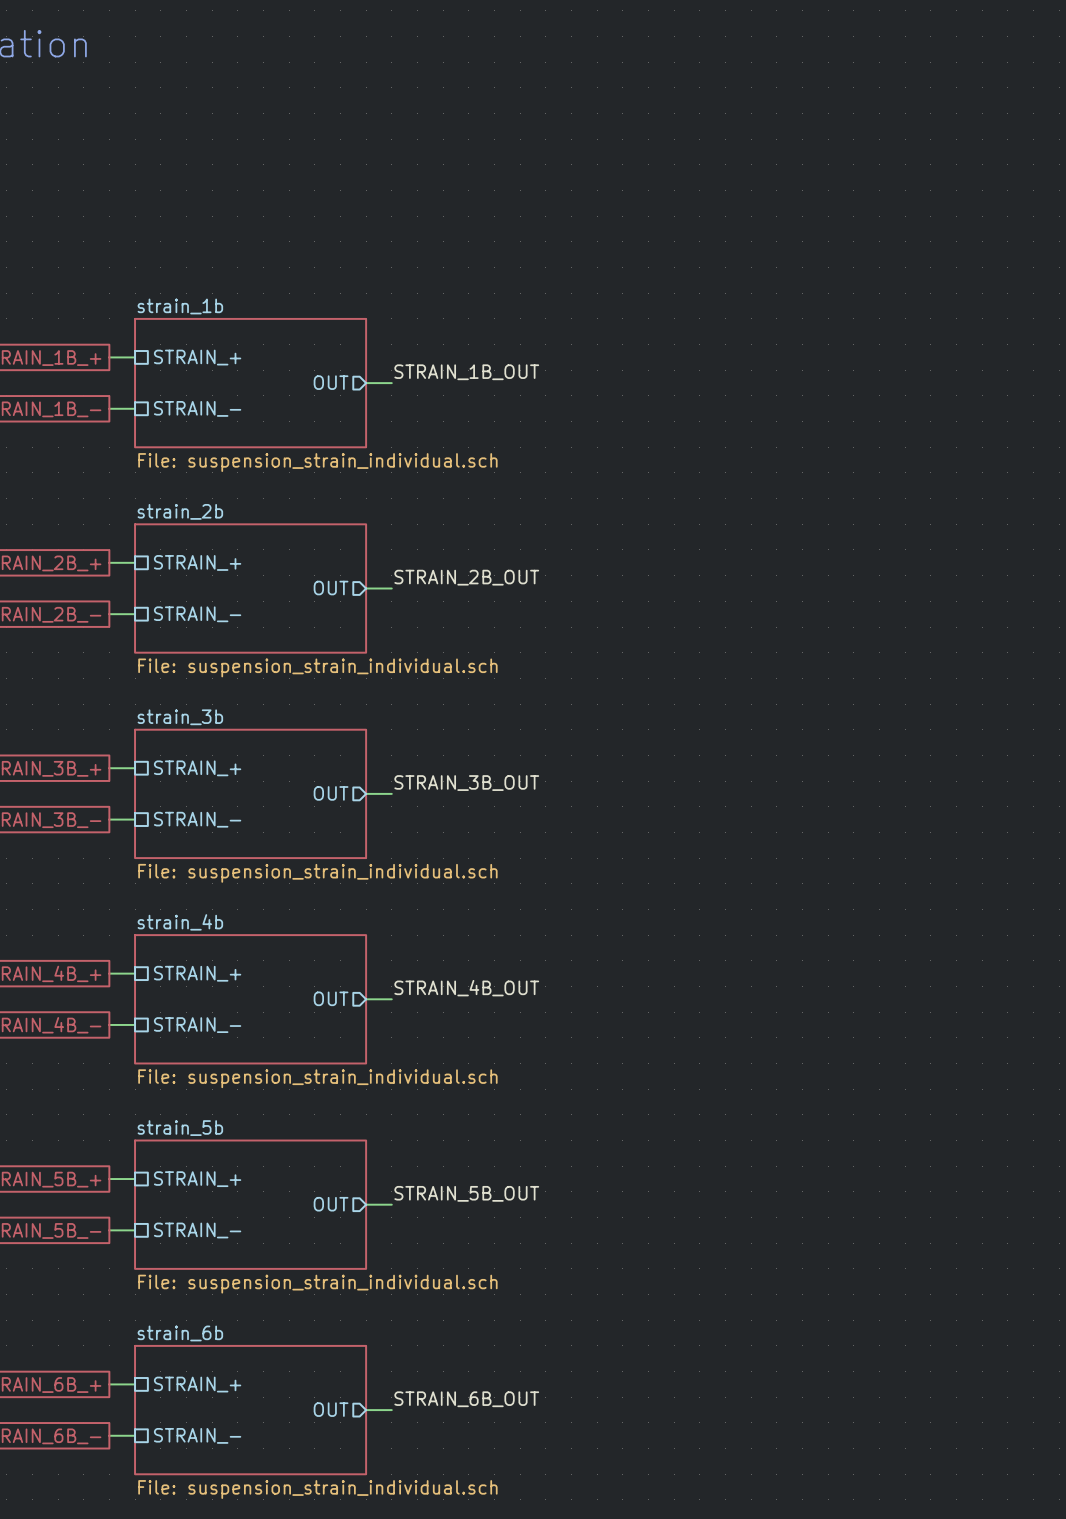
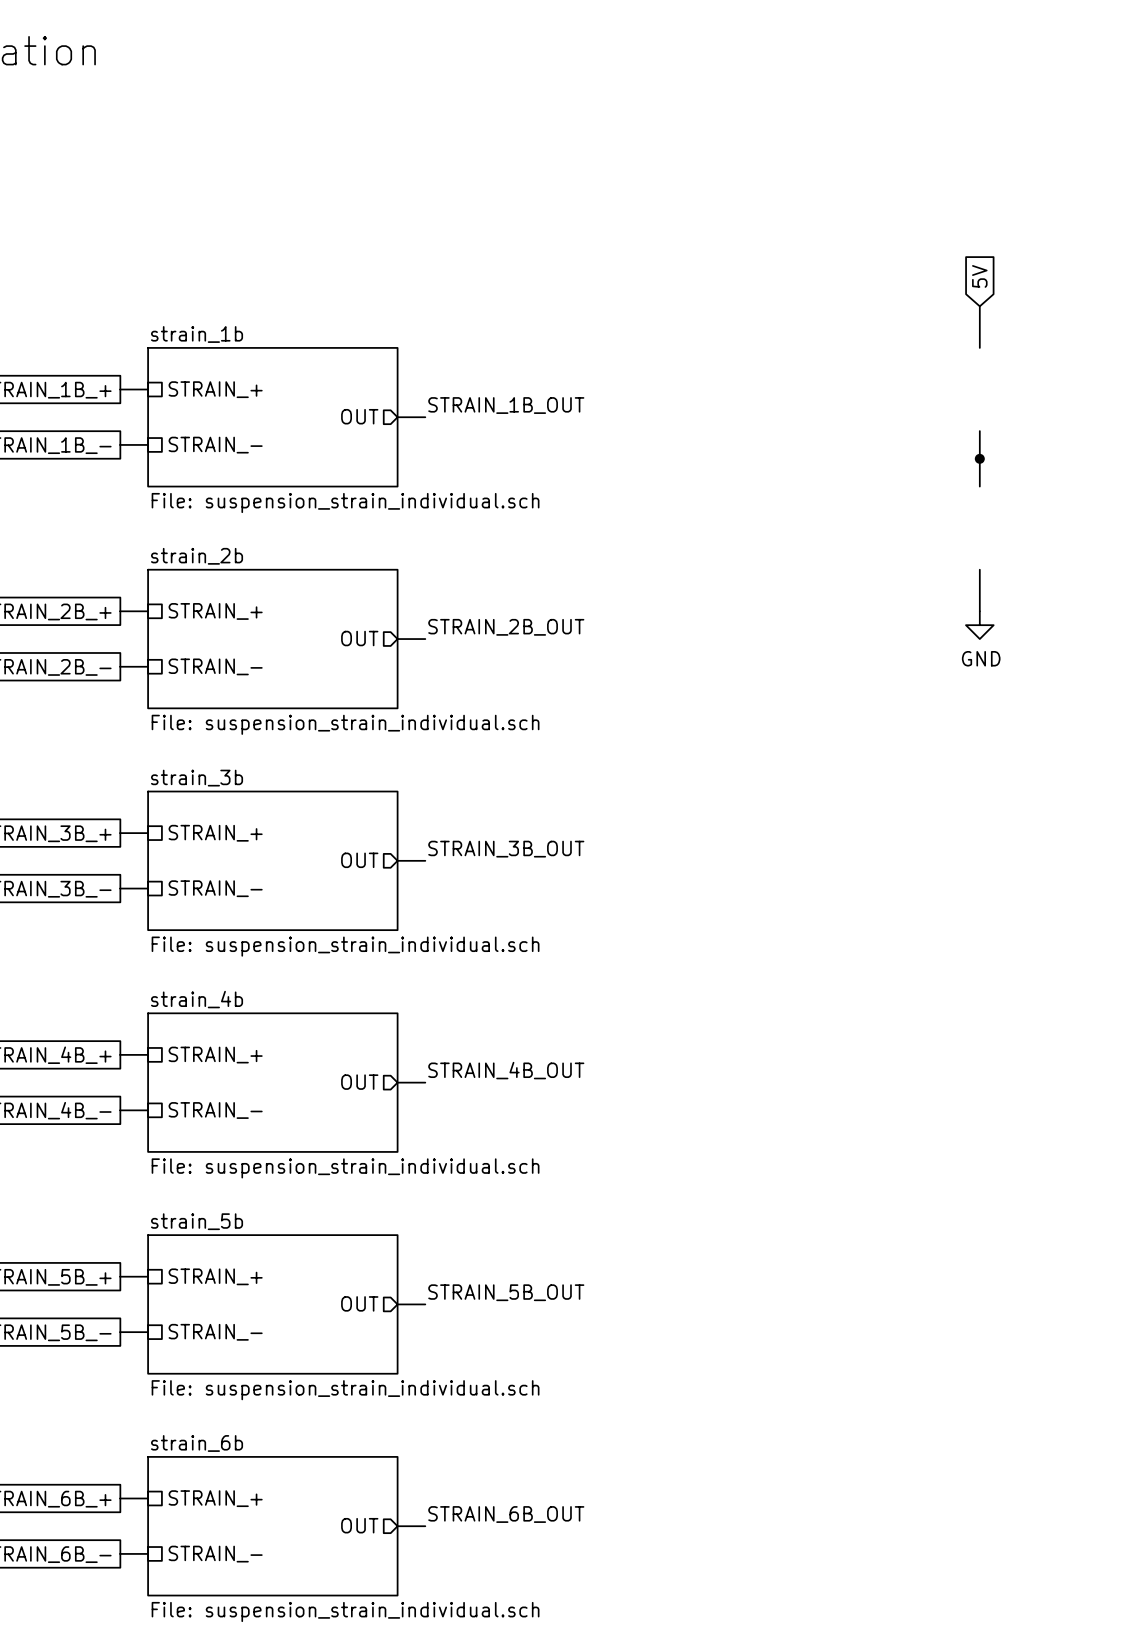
global label: none -> 5V (979, 276)
wire: none -> (979, 306) (979, 347)
wire: none -> (979, 431) (979, 486)
junction: none -> (979, 458)
wire: none -> (979, 569) (979, 611)
power symbol: none -> GND (979, 625)

